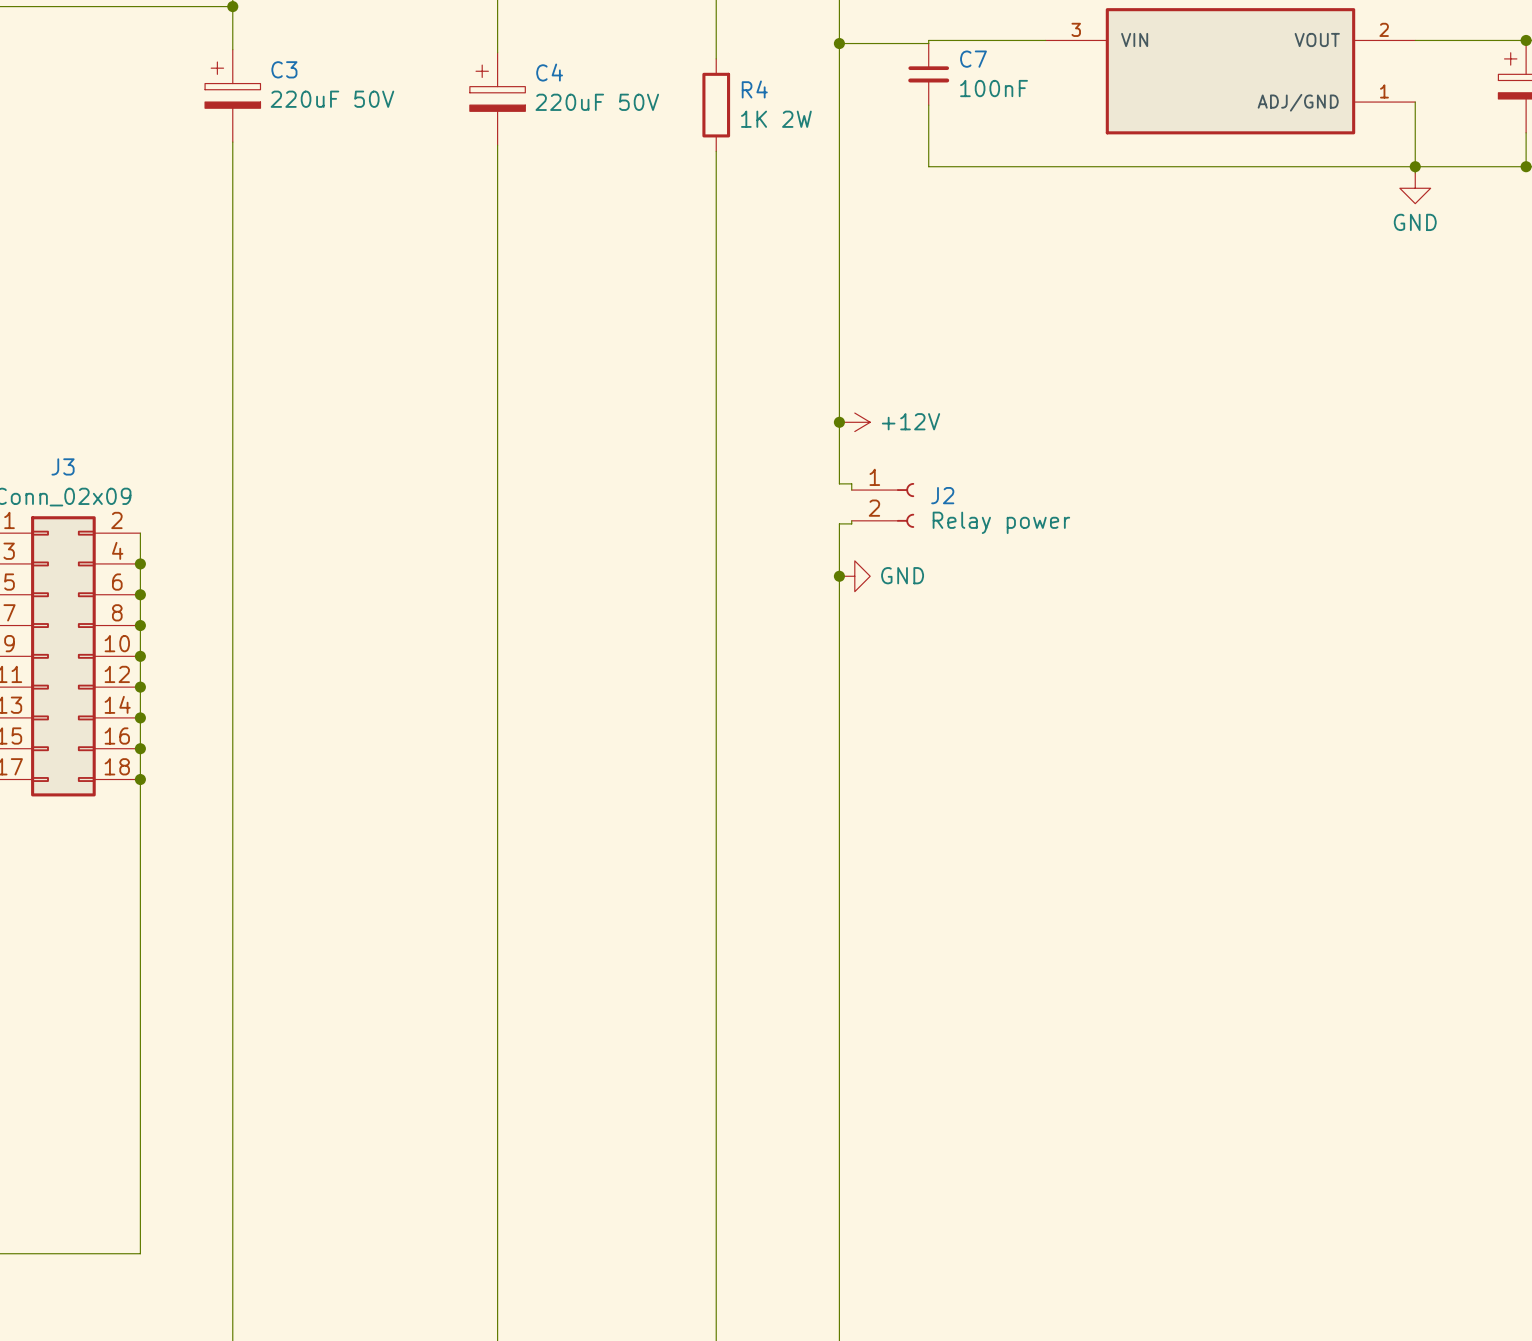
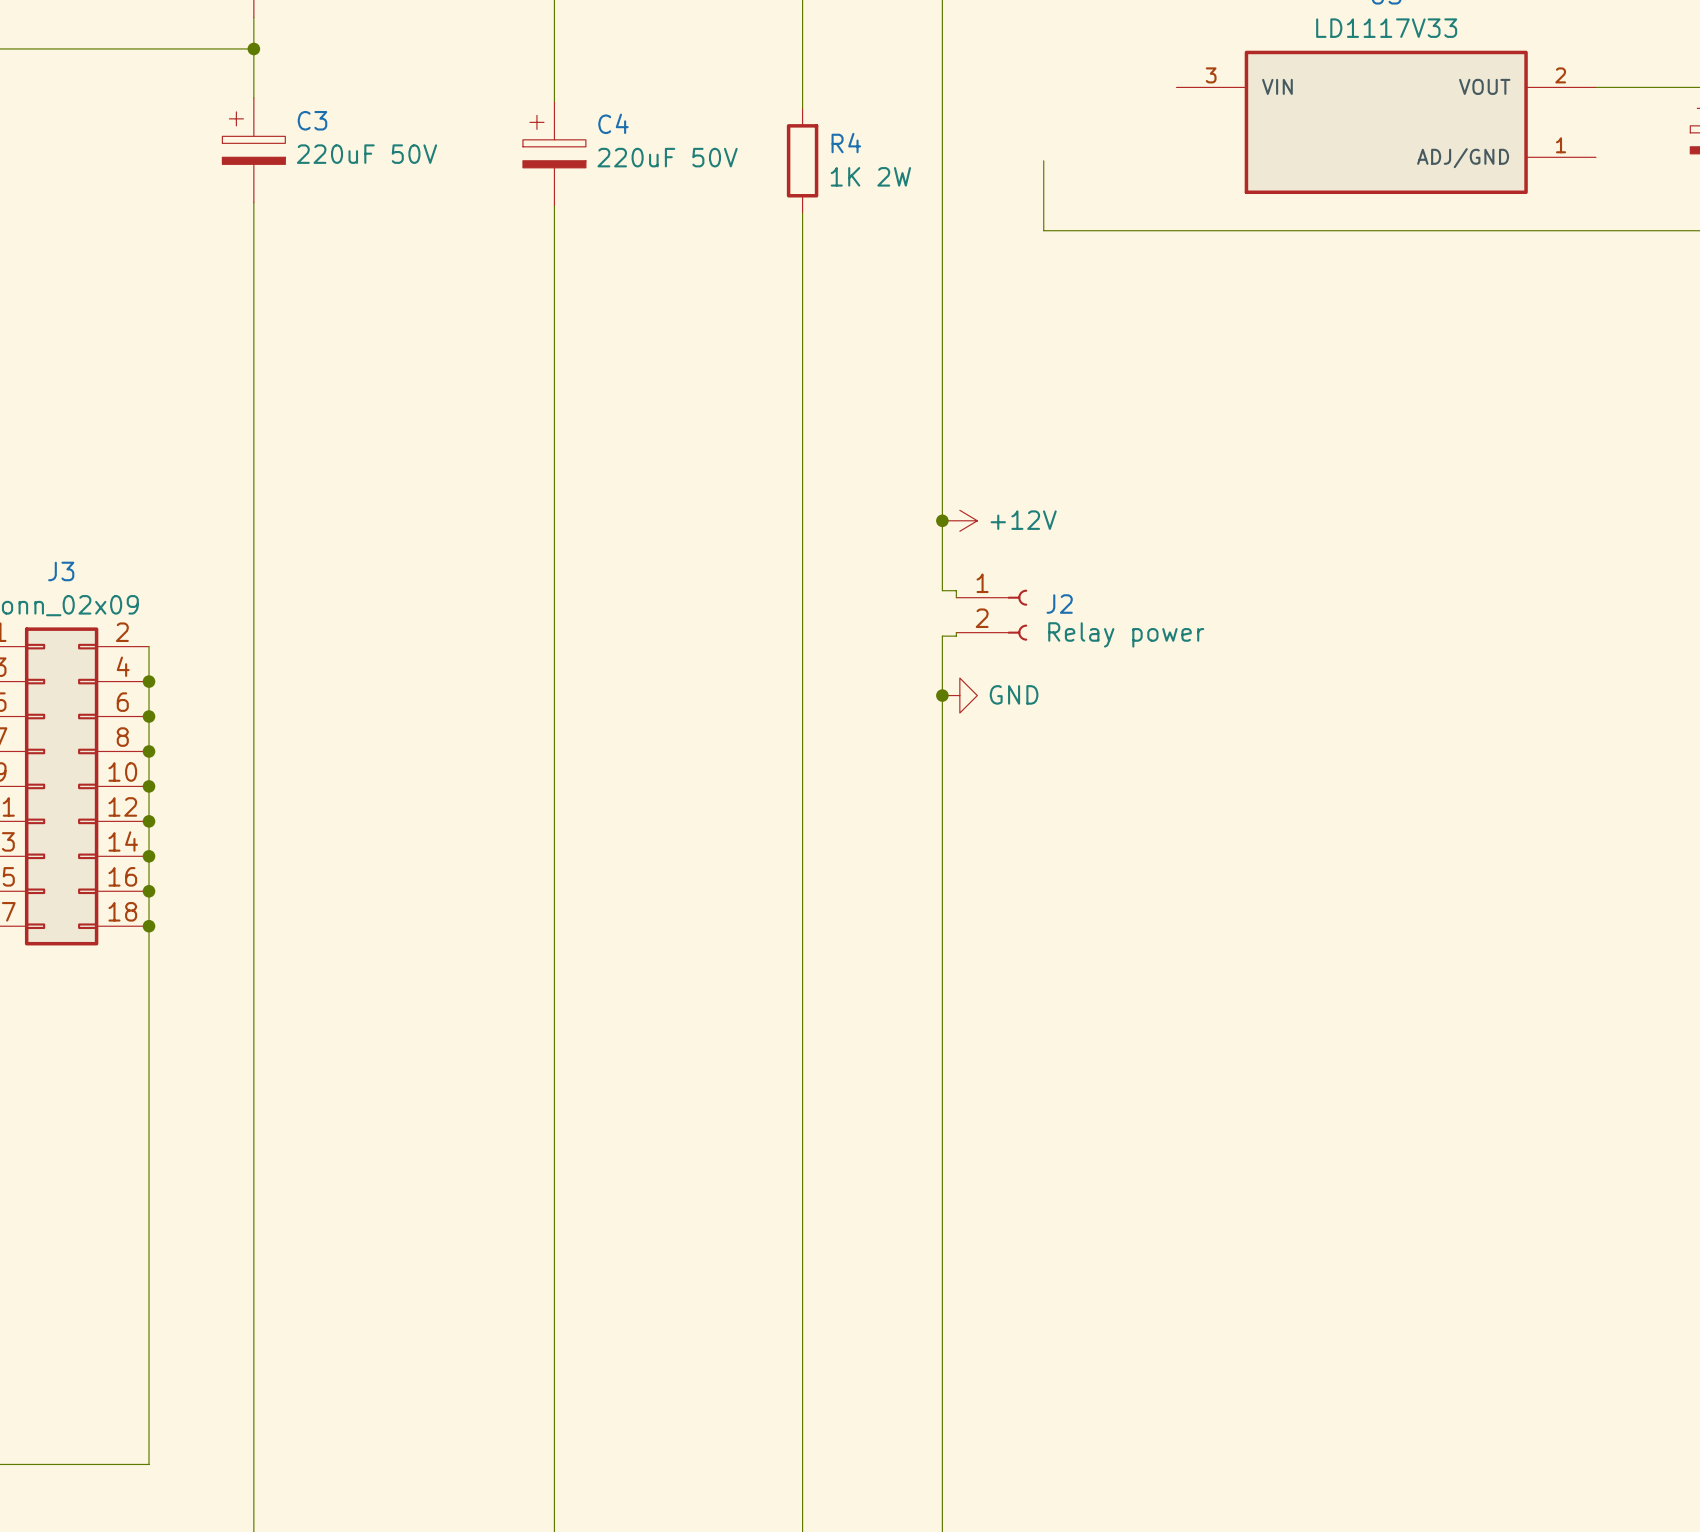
wire: (1045, 40) (928, 40) (928, 43) (839, 43) -> none
junction: (839, 43) -> none
C7: 100nF (928, 74) -> none
wire: (1415, 102) (1415, 172) -> none
junction: (1415, 166) -> none
power symbol: GND (1415, 188) -> none

